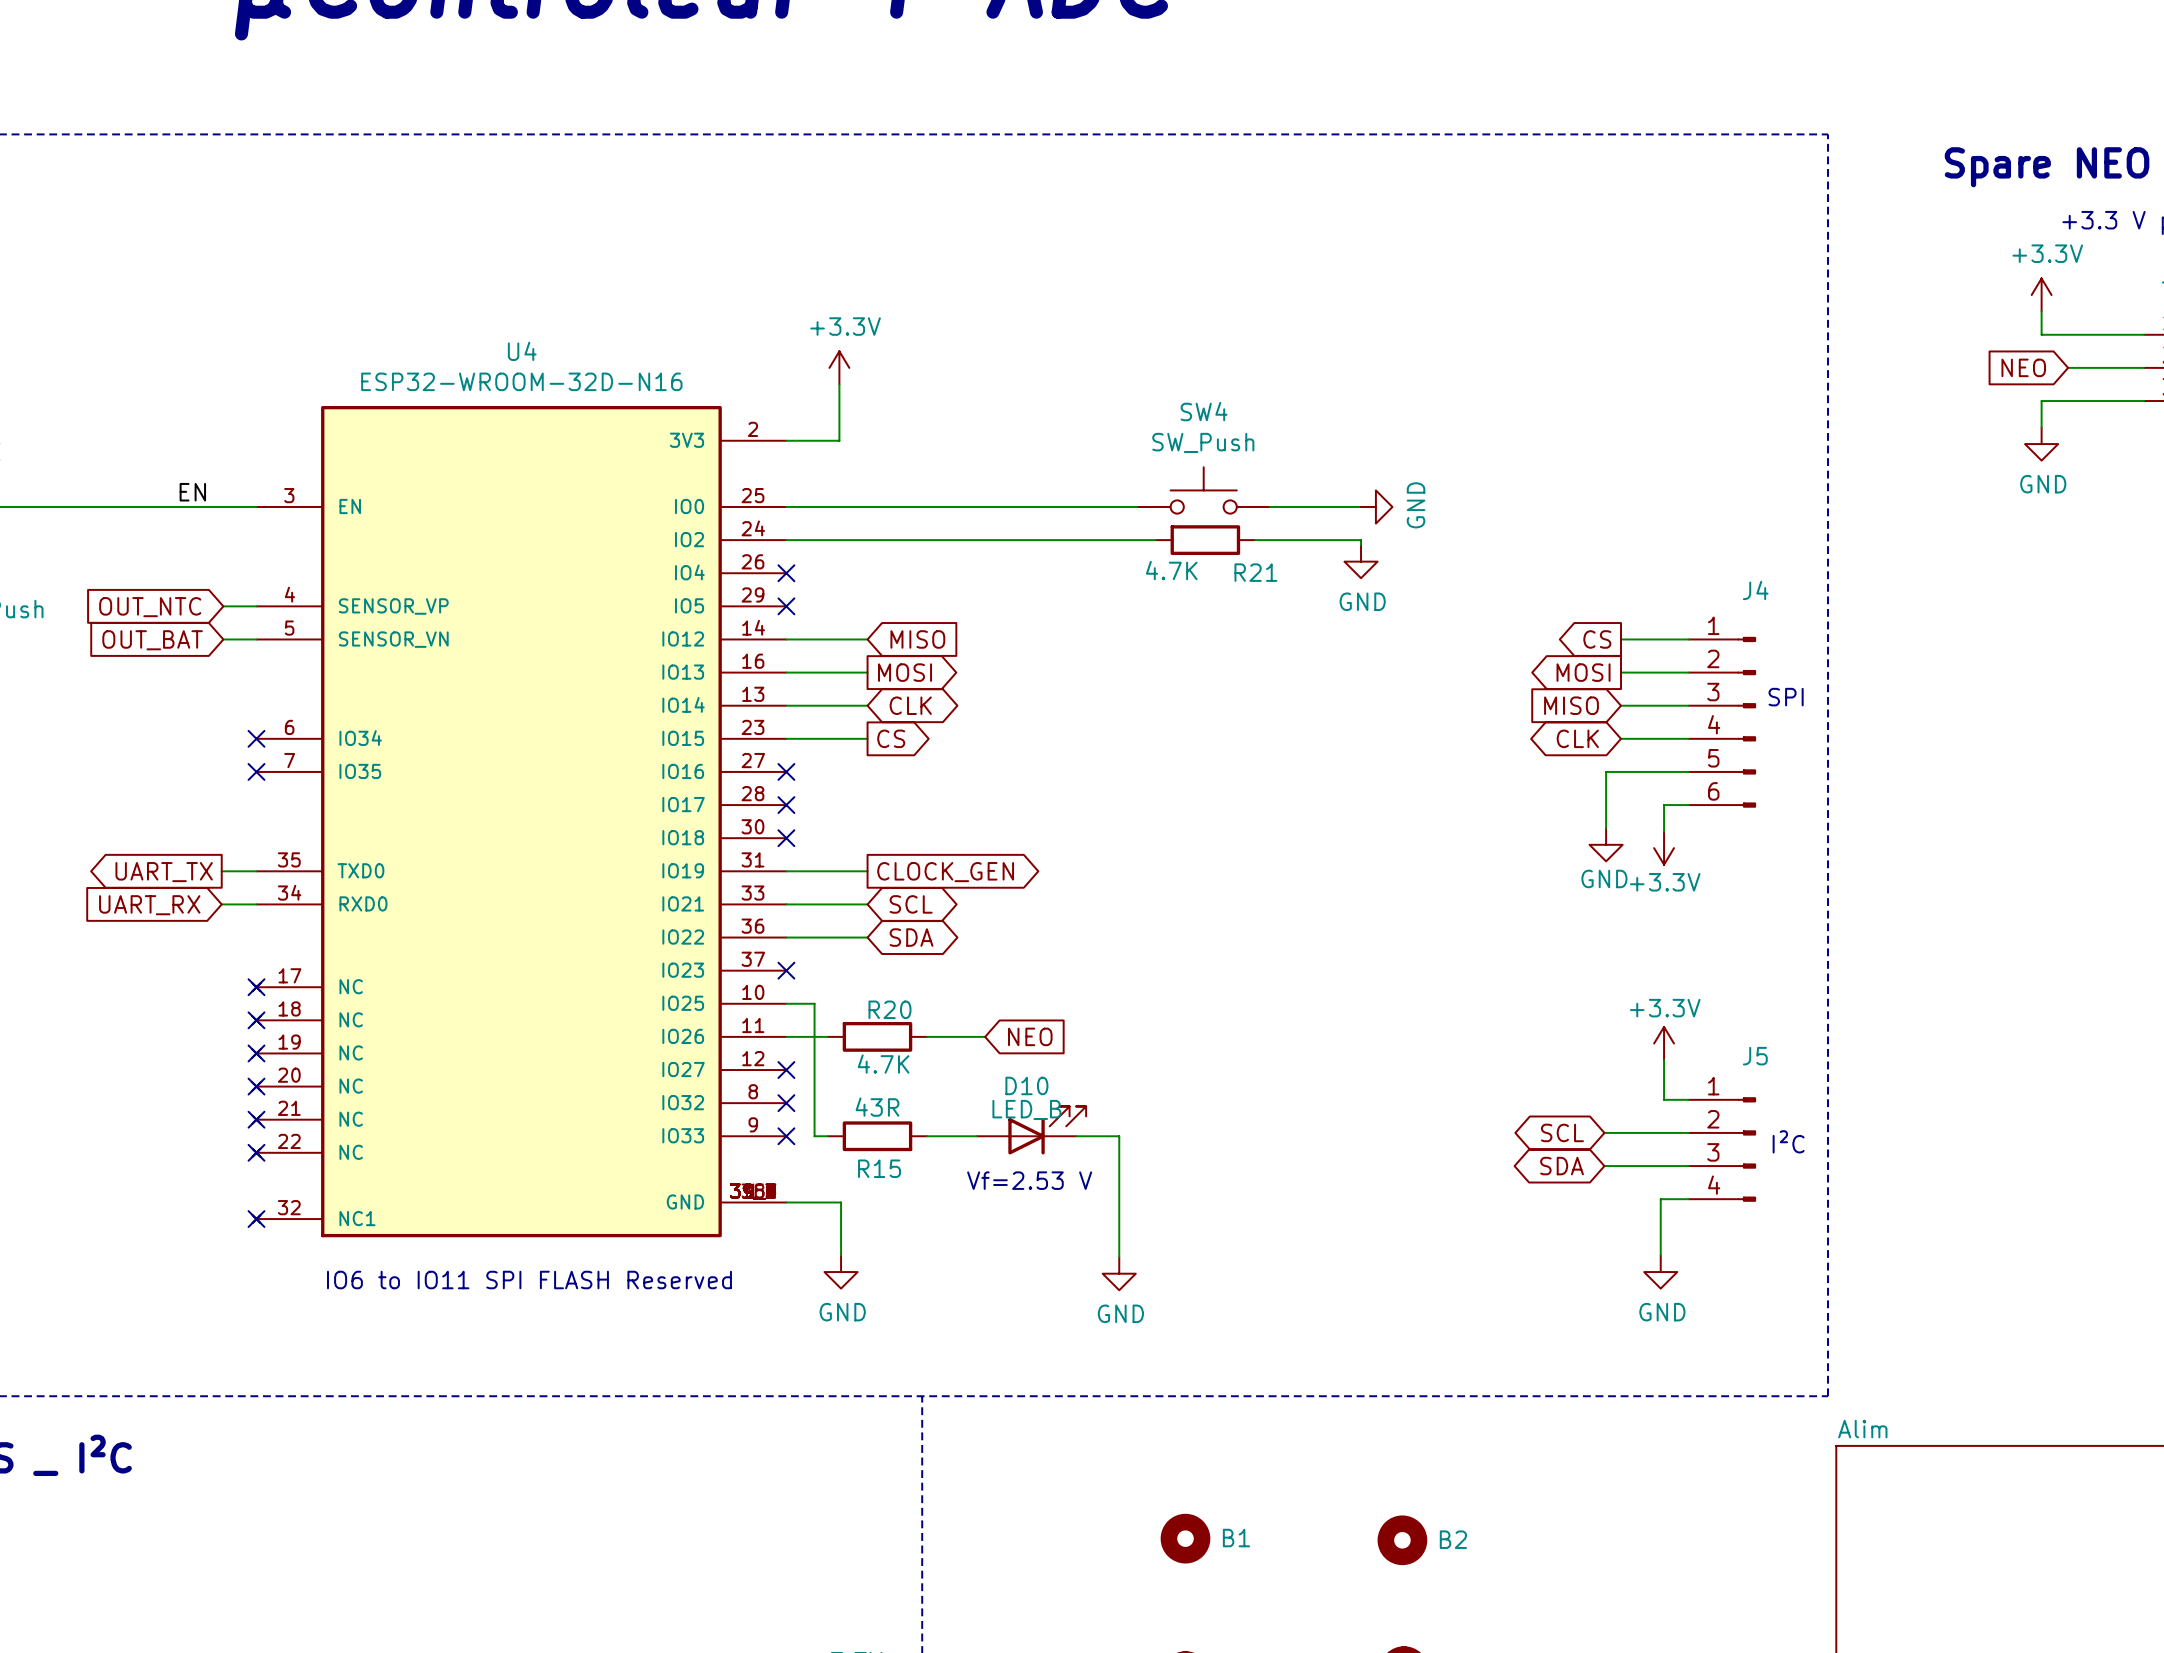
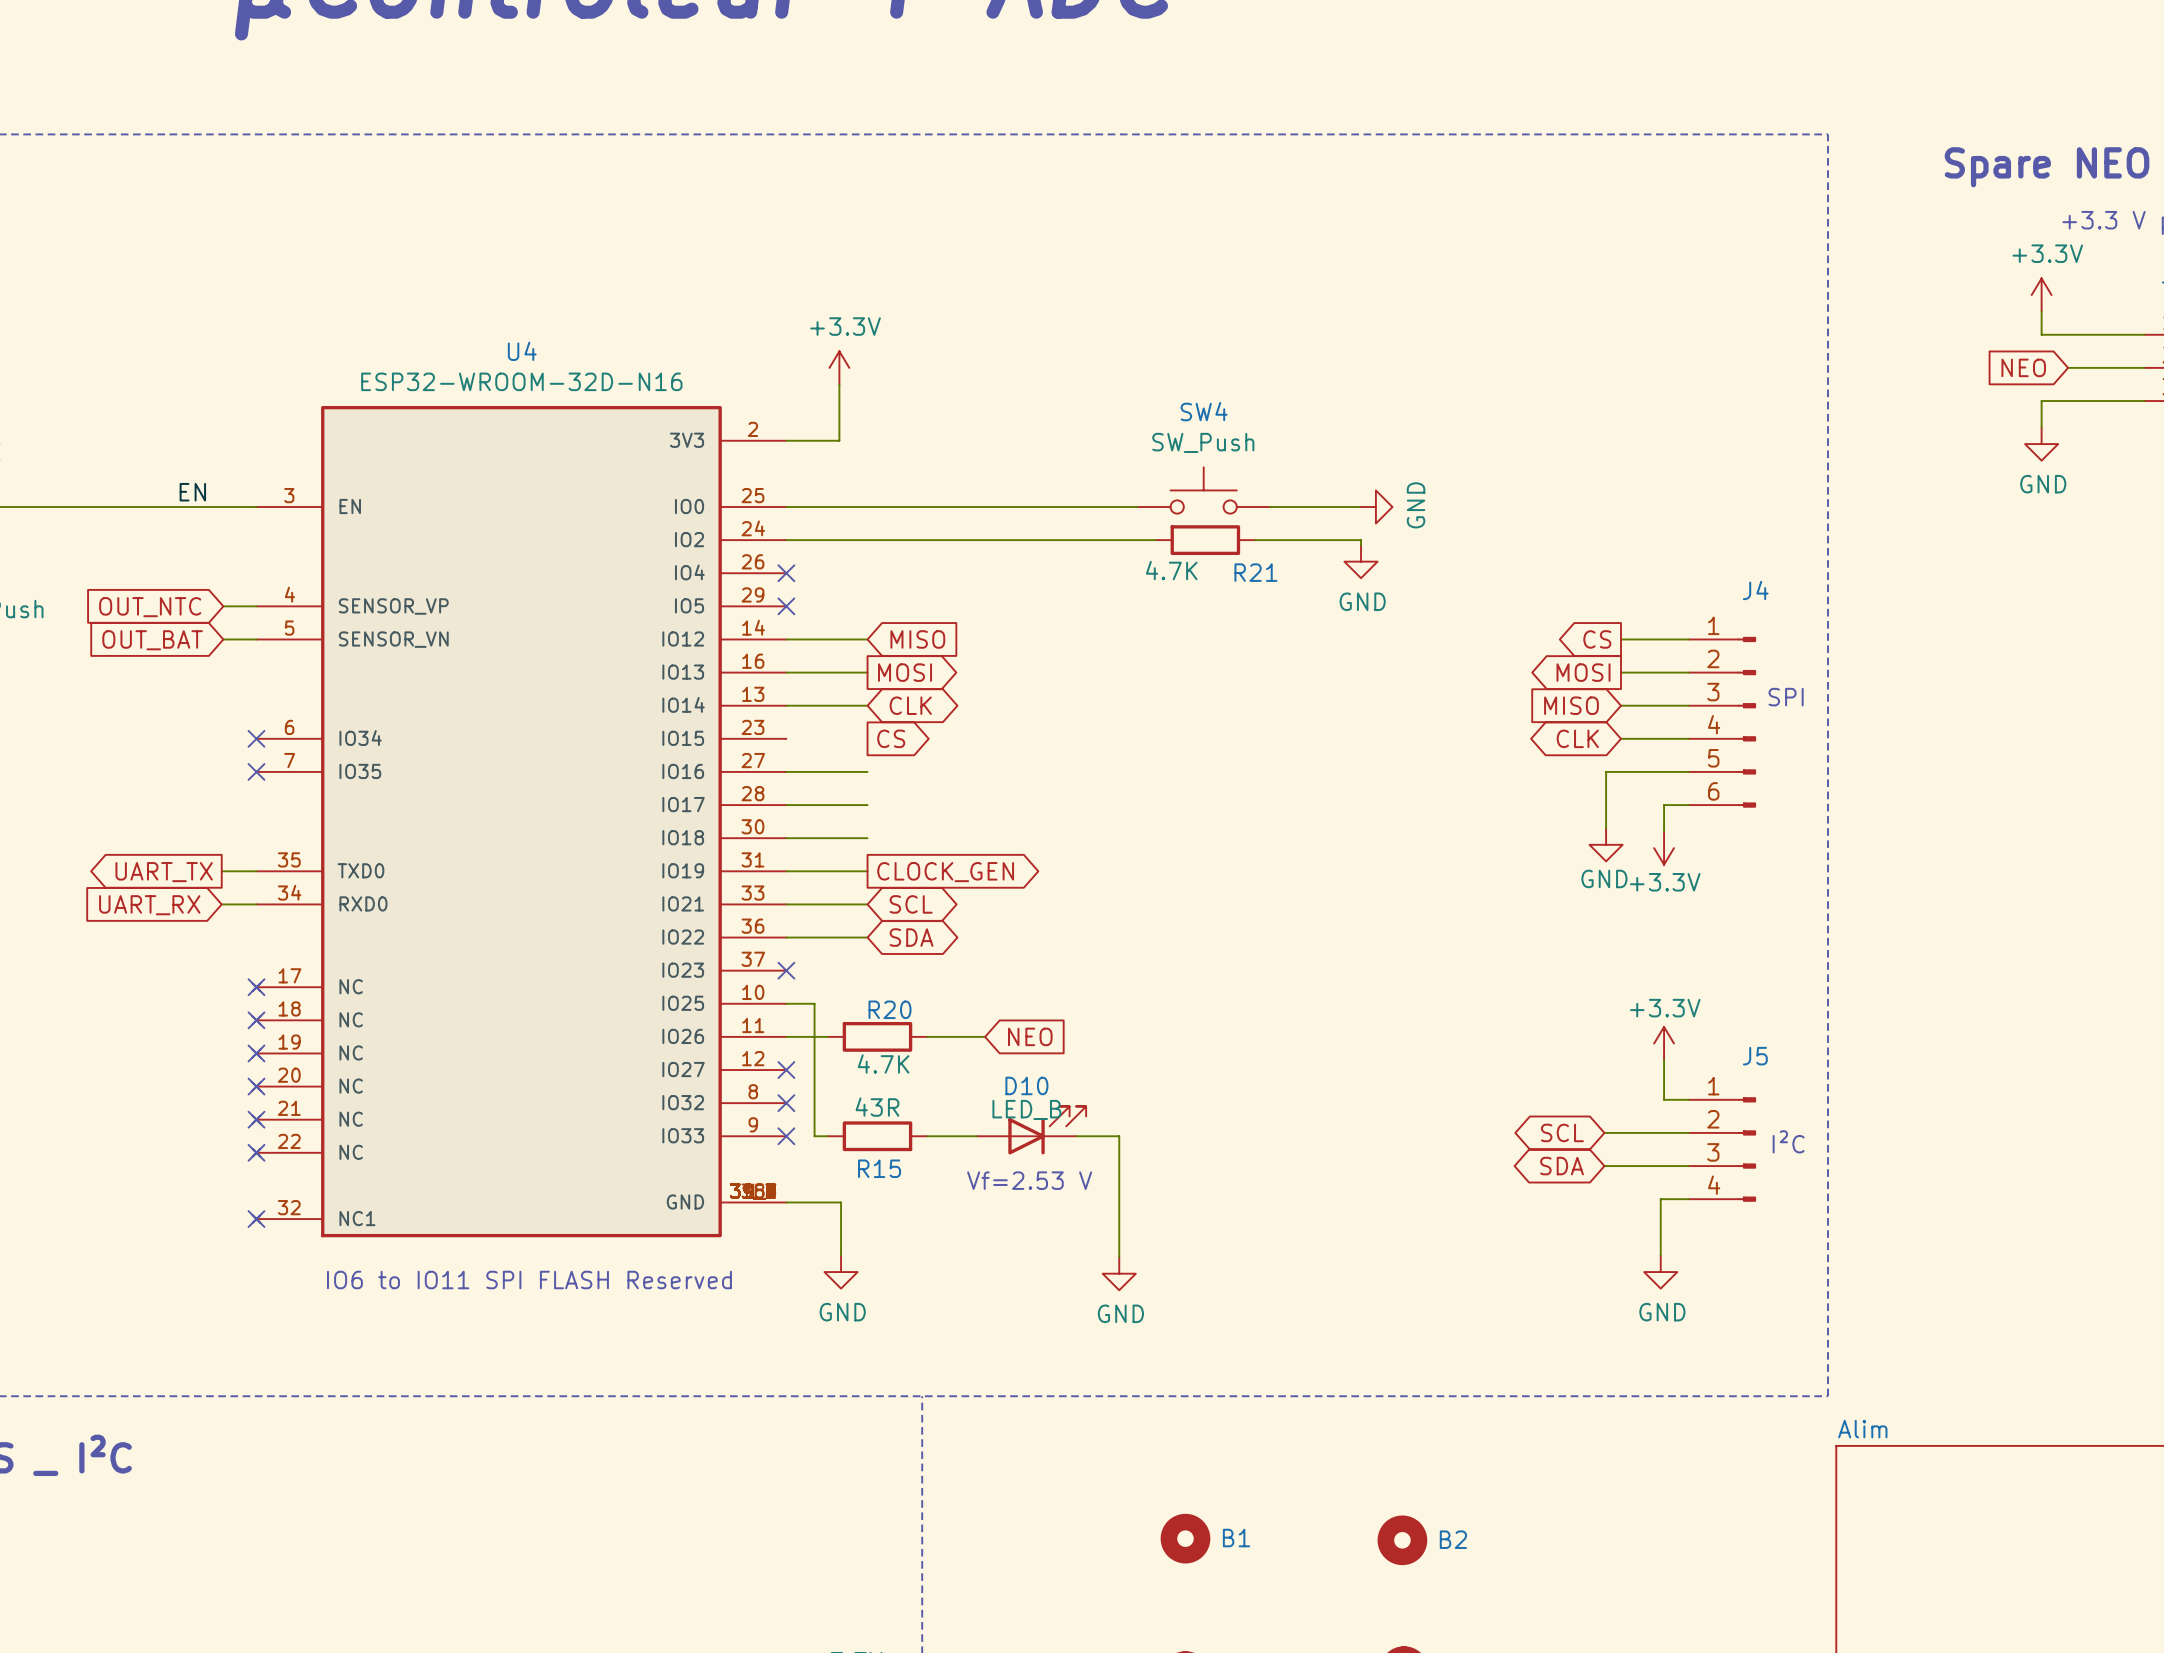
wire: (786, 738) (867, 738) -> (786, 771) (867, 771)
no-connect mark: (786, 771) -> none
wire: none -> (786, 805) (867, 805)
no-connect mark: (786, 805) -> none
wire: none -> (786, 838) (867, 838)
no-connect mark: (786, 838) -> none

